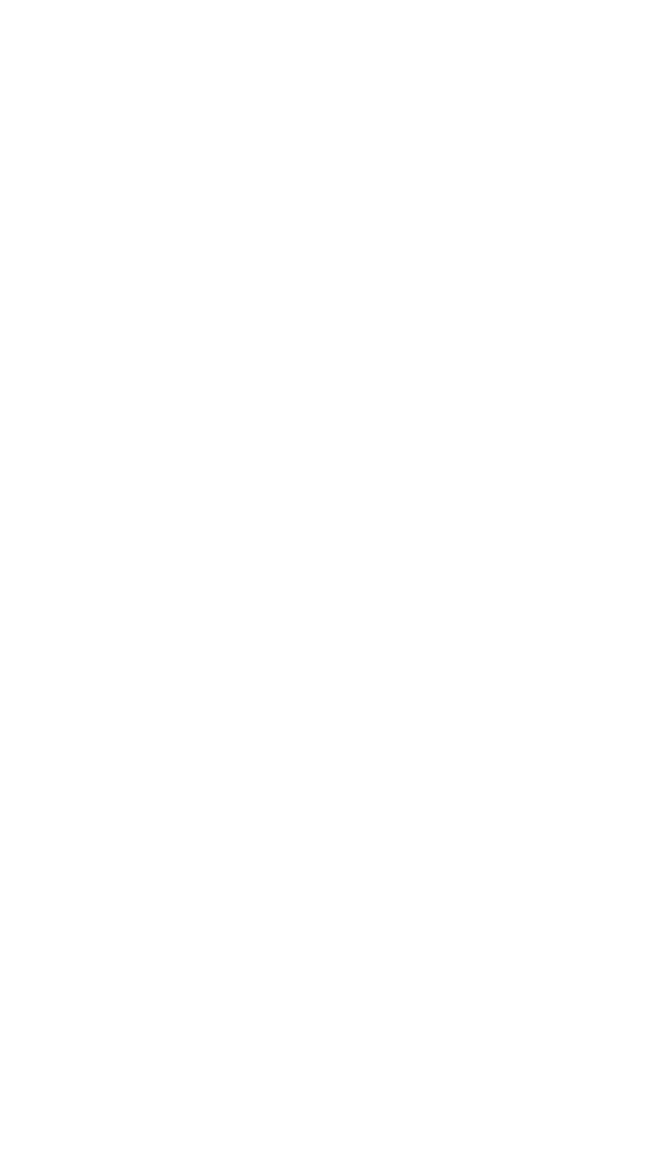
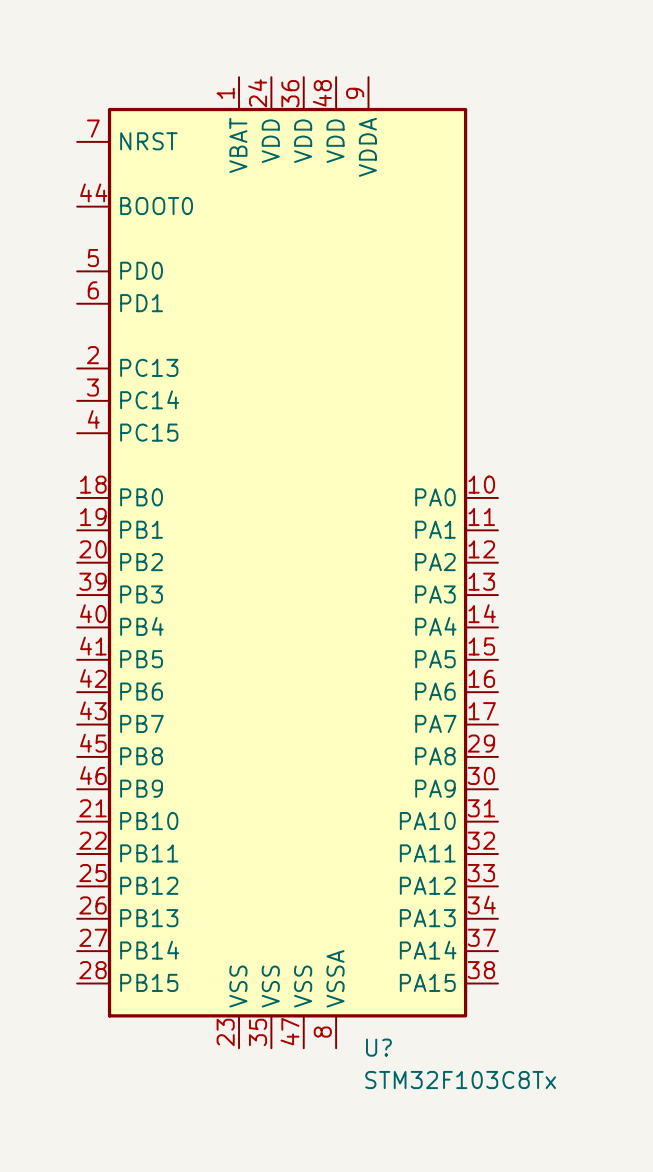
U?: none -> STM32F103C8Tx (287, 562)

